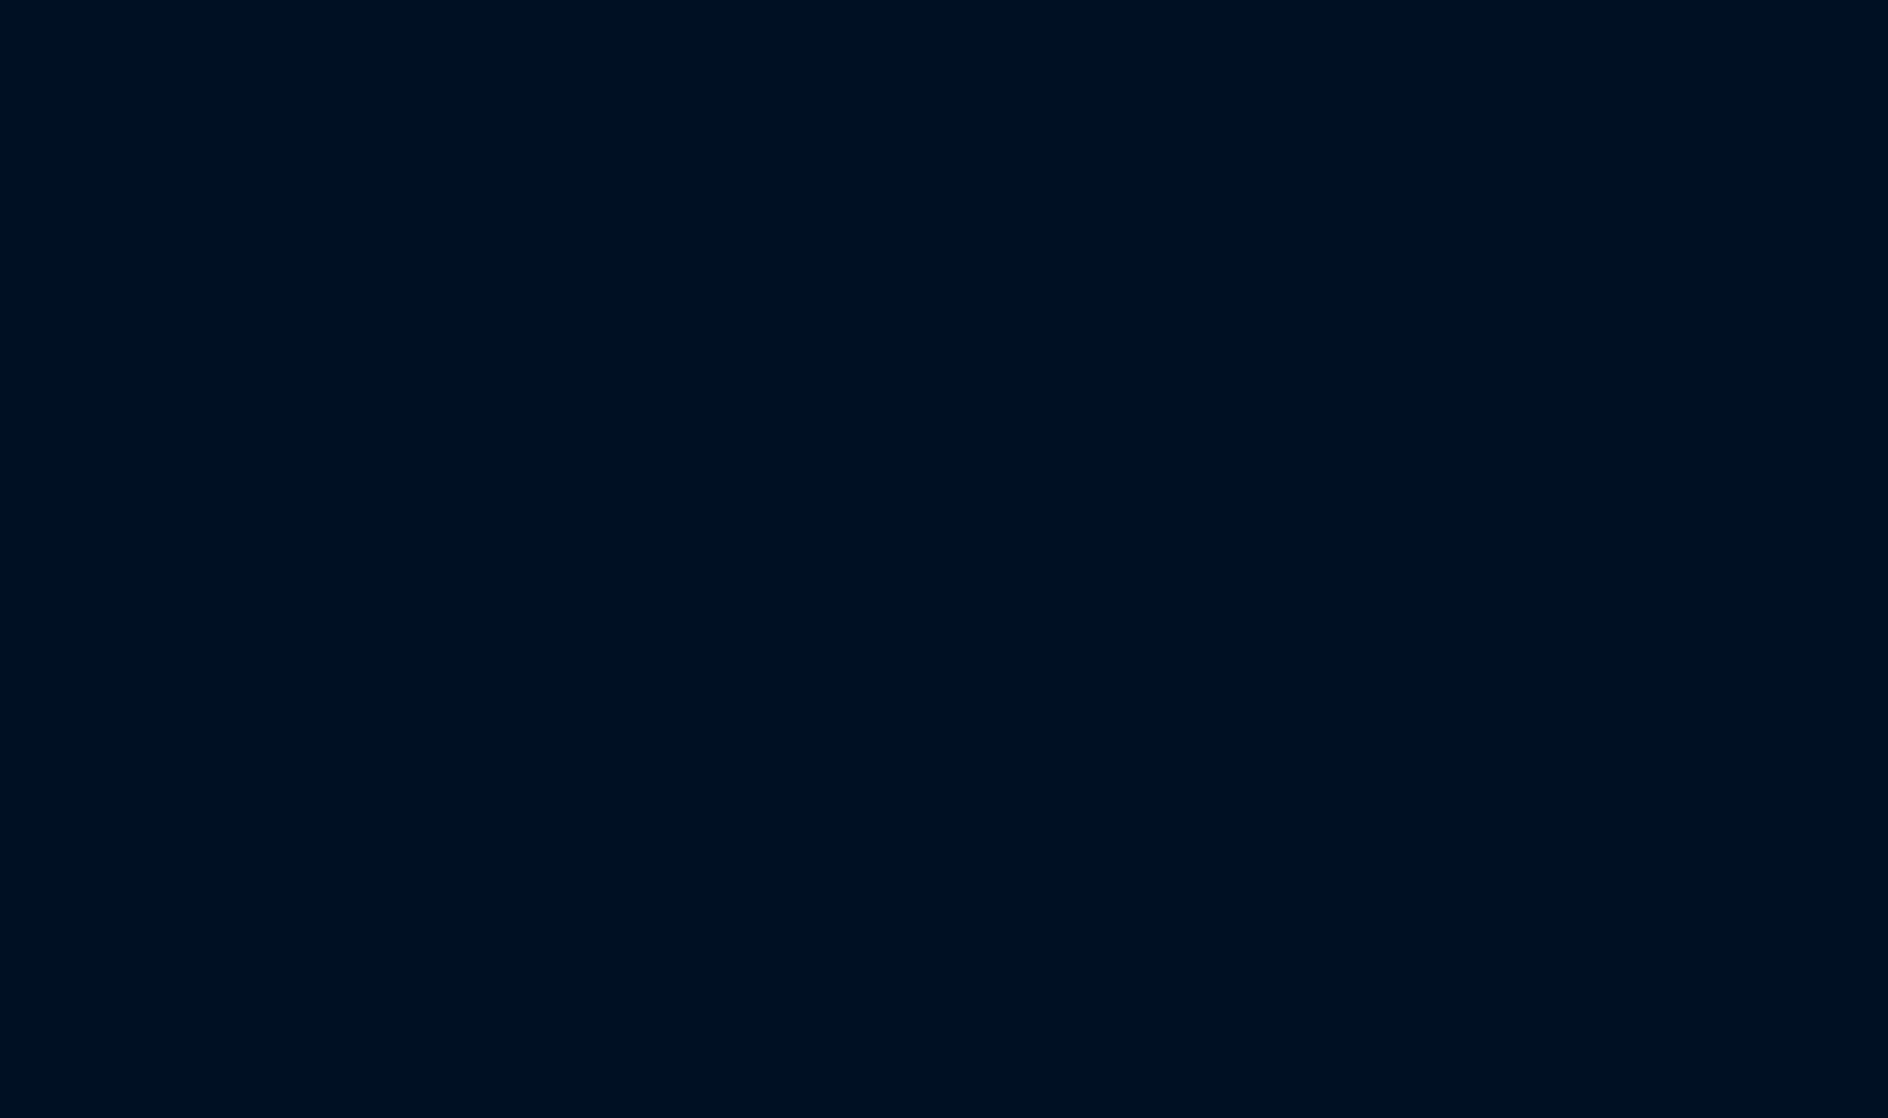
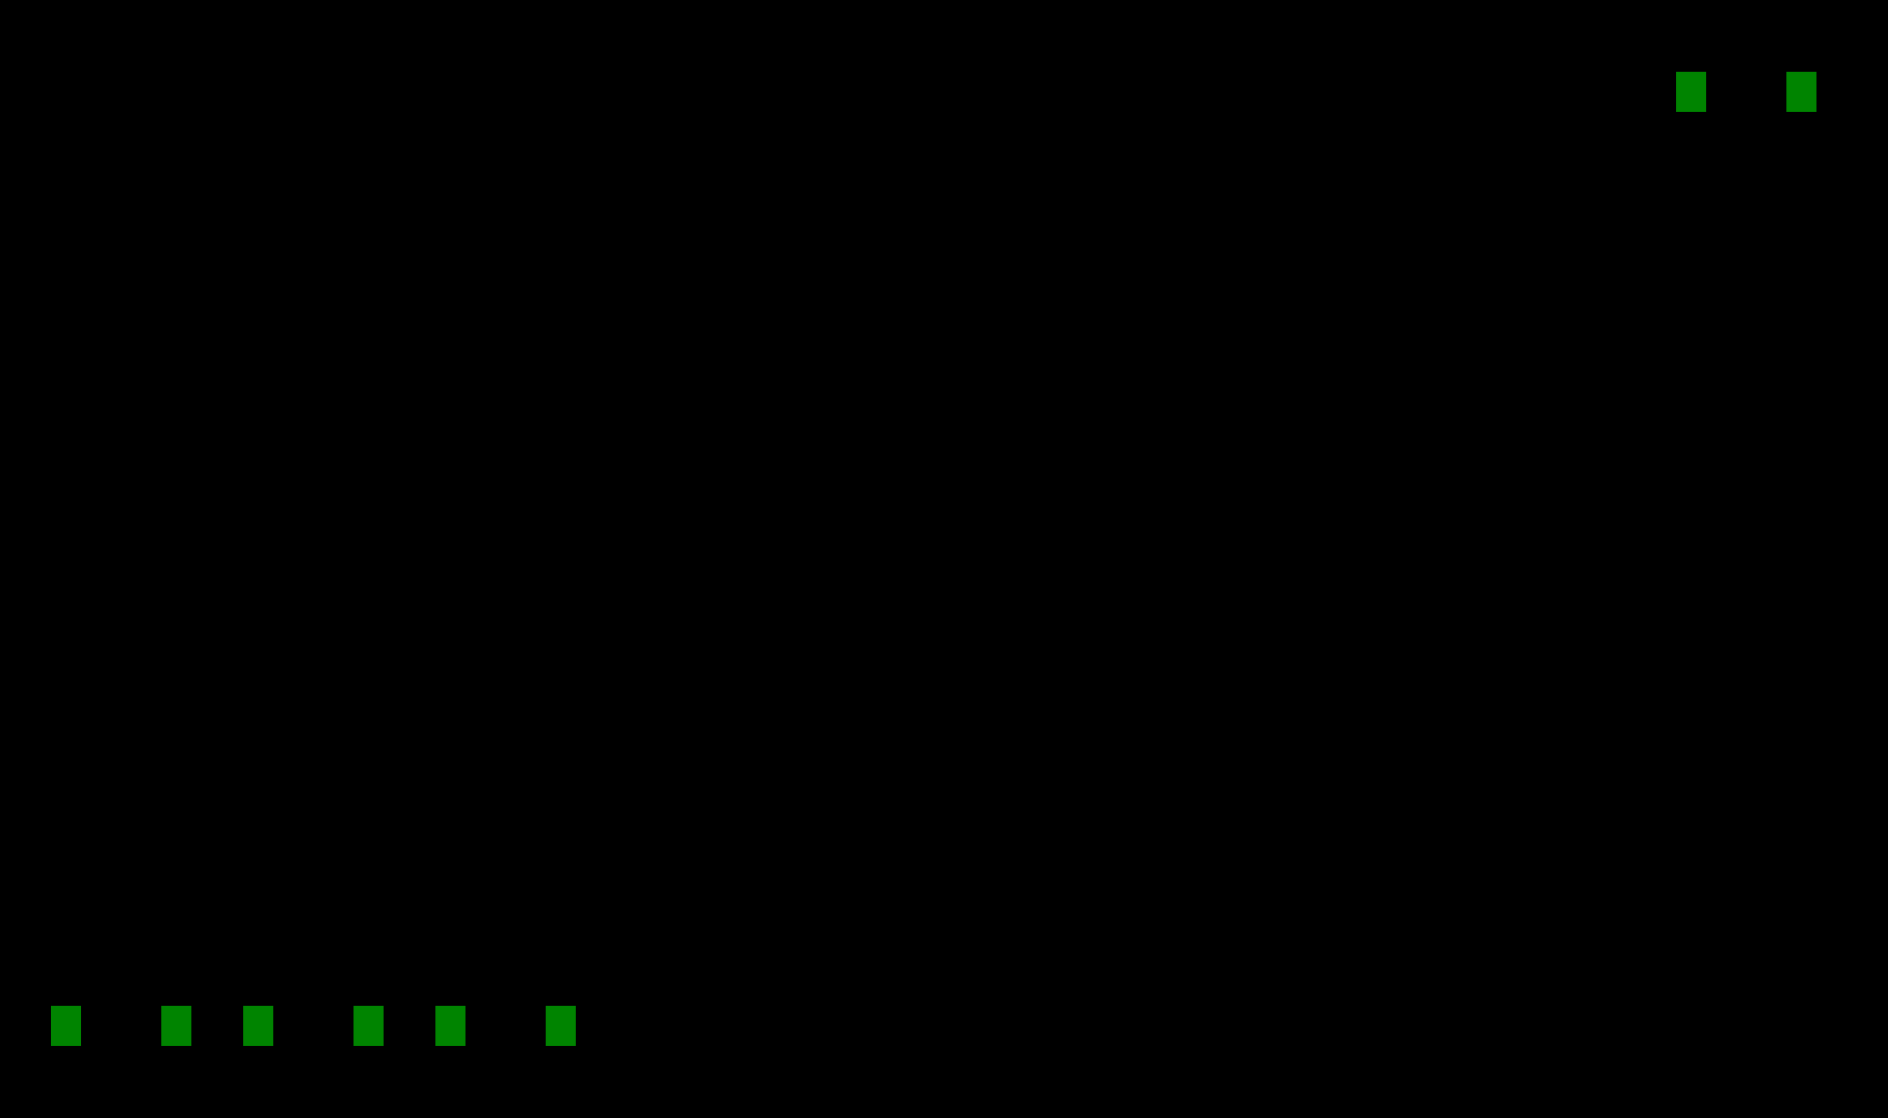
part: none -> (1746, 91)
part: none -> (121, 1025)
part: none -> (313, 1025)
part: none -> (505, 1025)

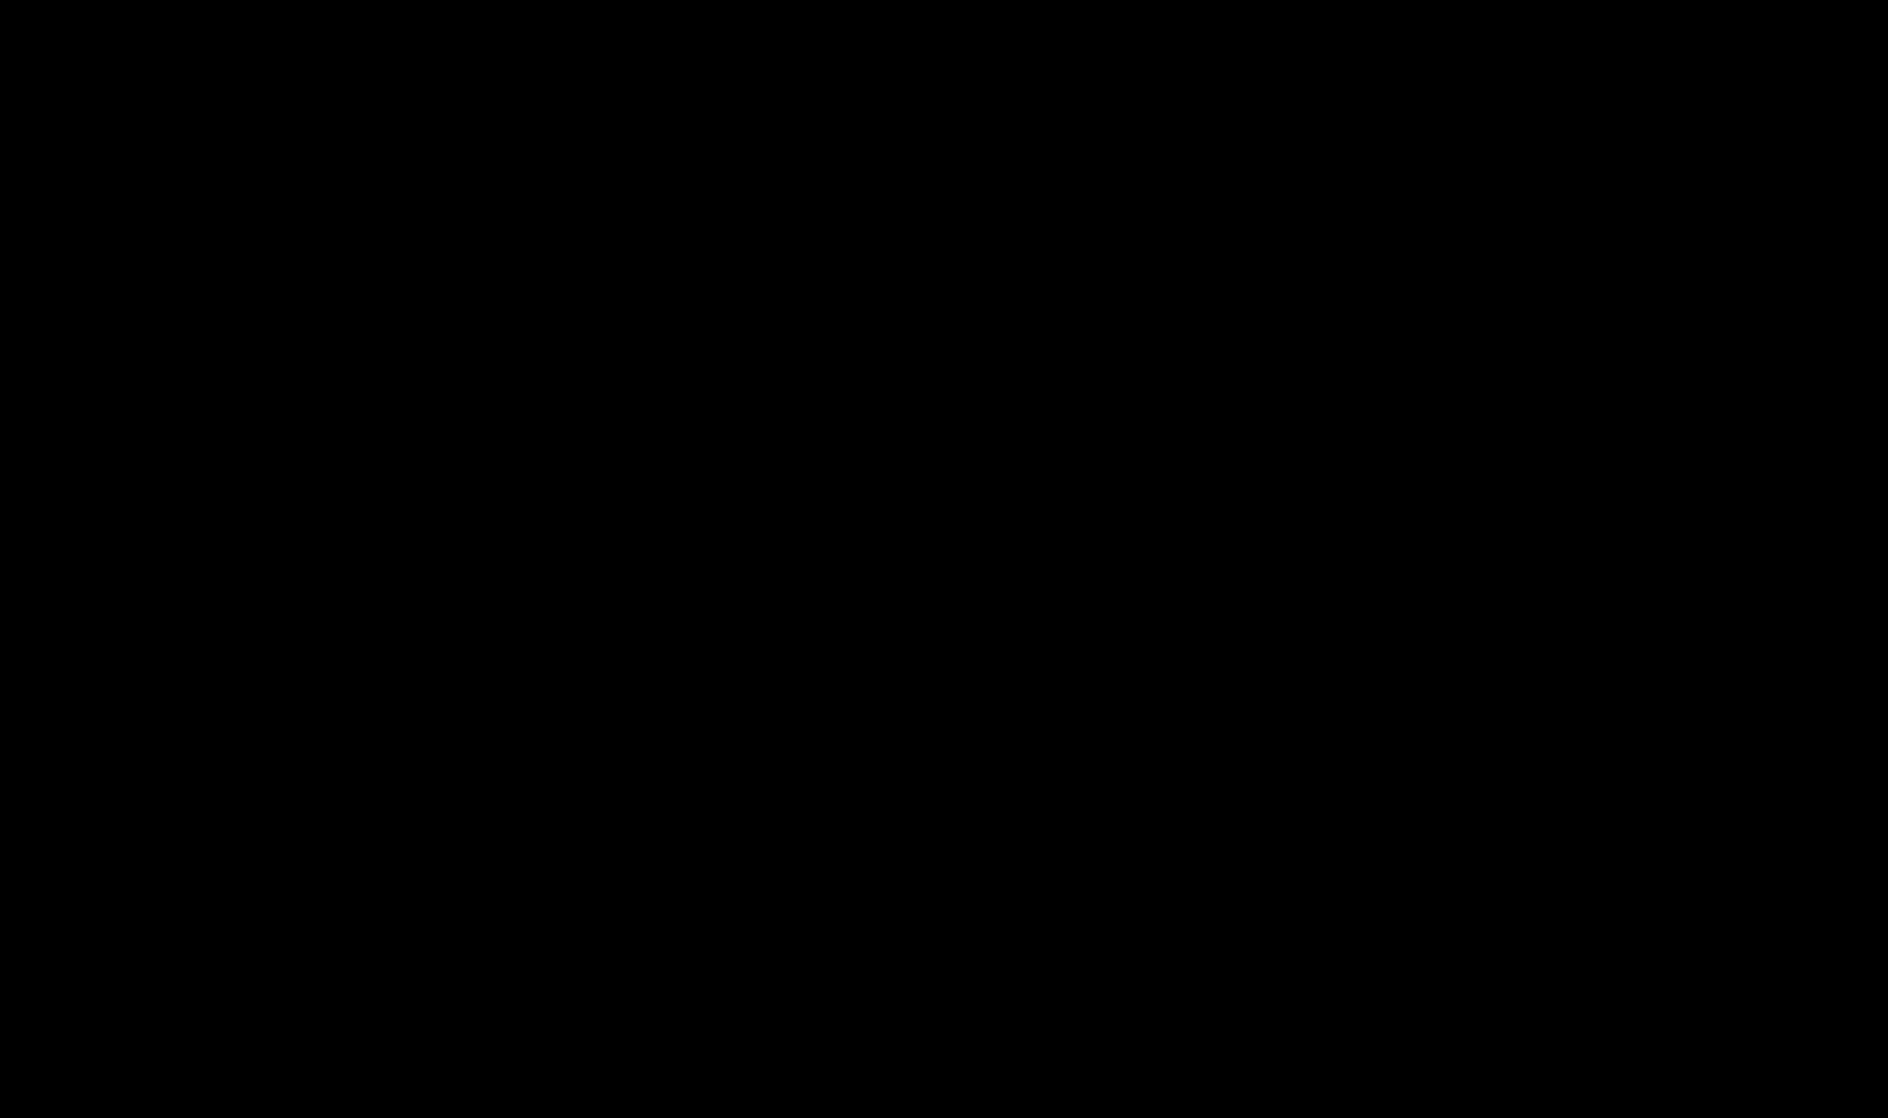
part: (1746, 91) -> none
part: (121, 1025) -> none
part: (313, 1025) -> none
part: (505, 1025) -> none

